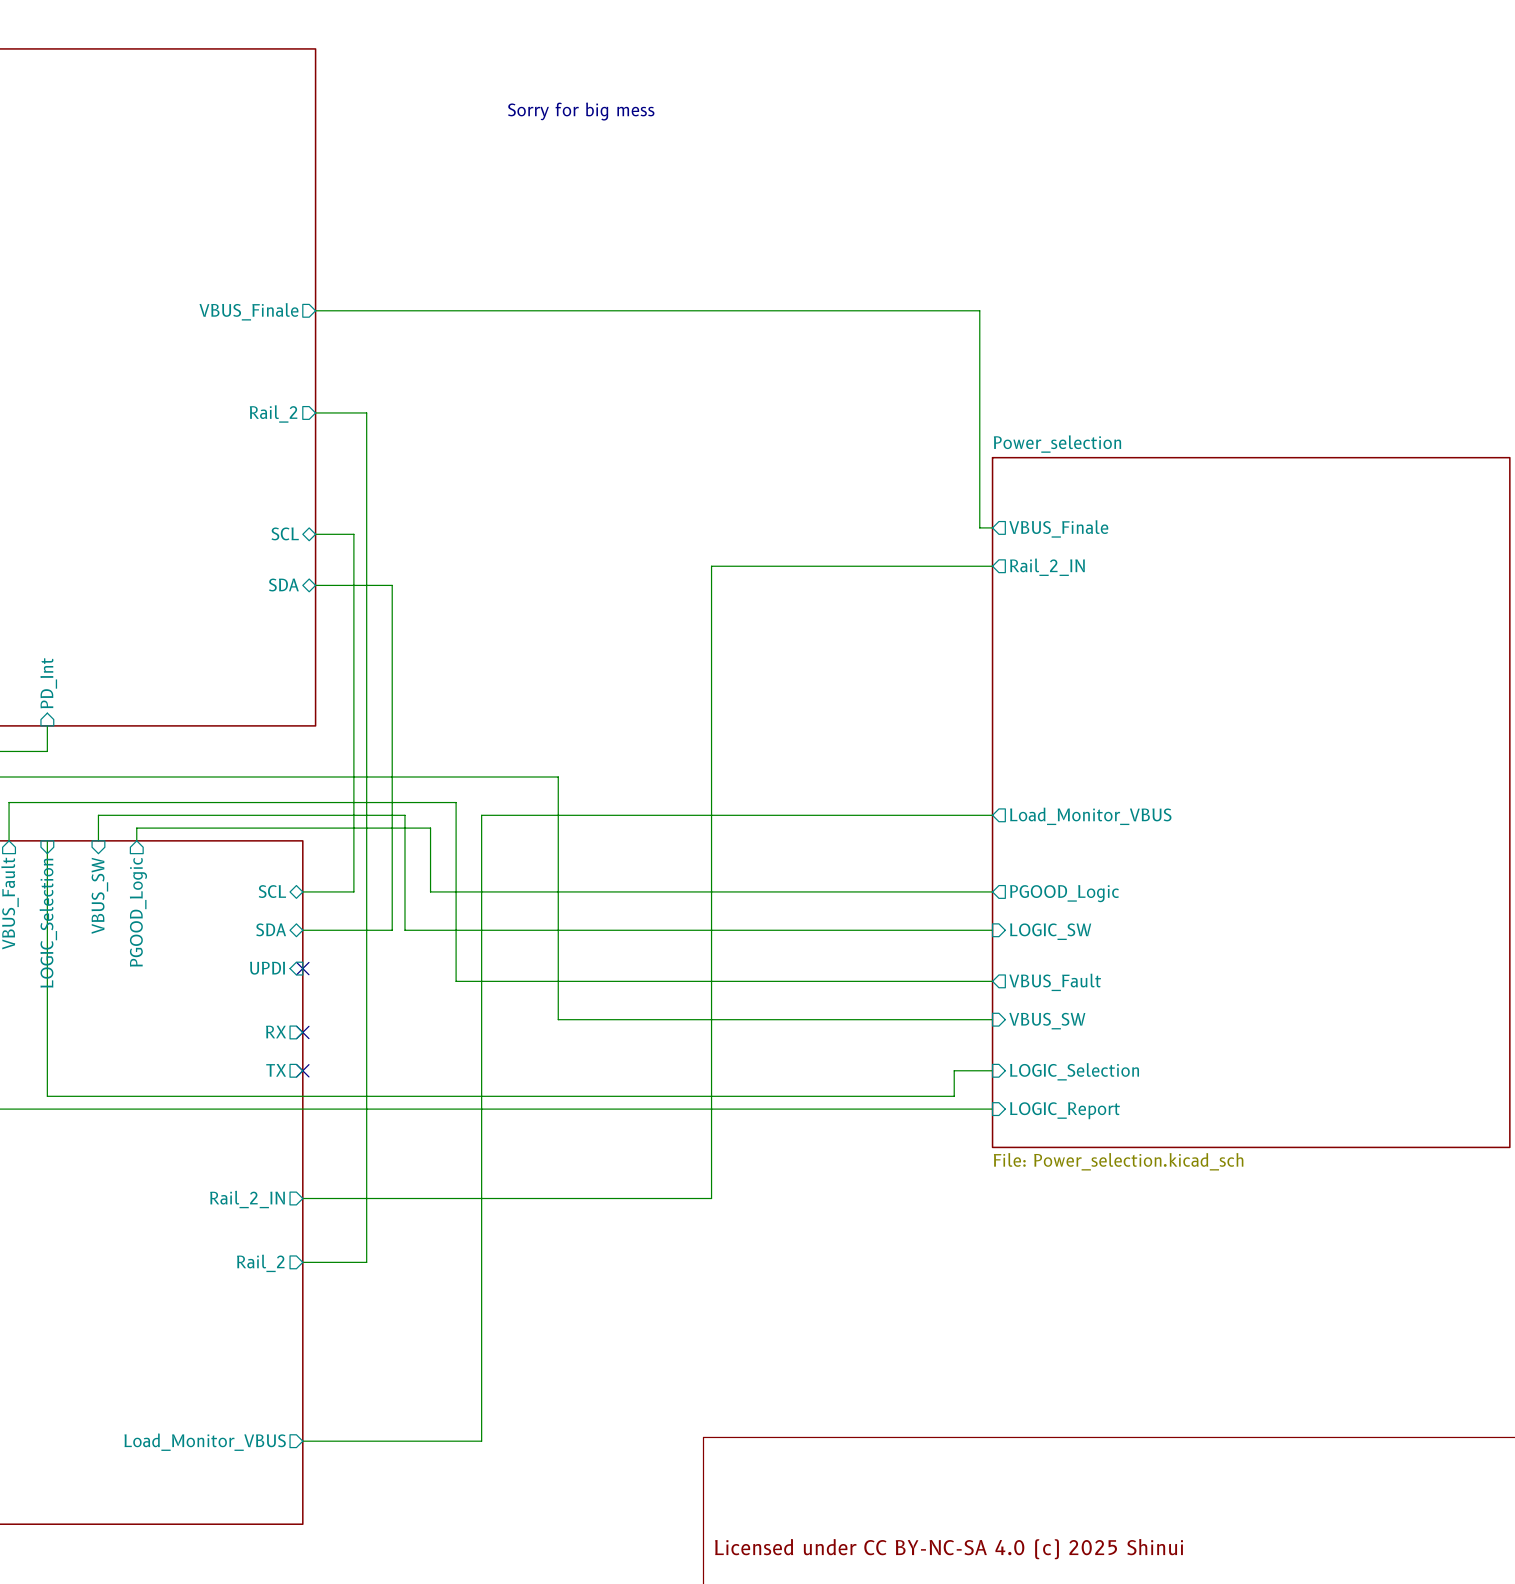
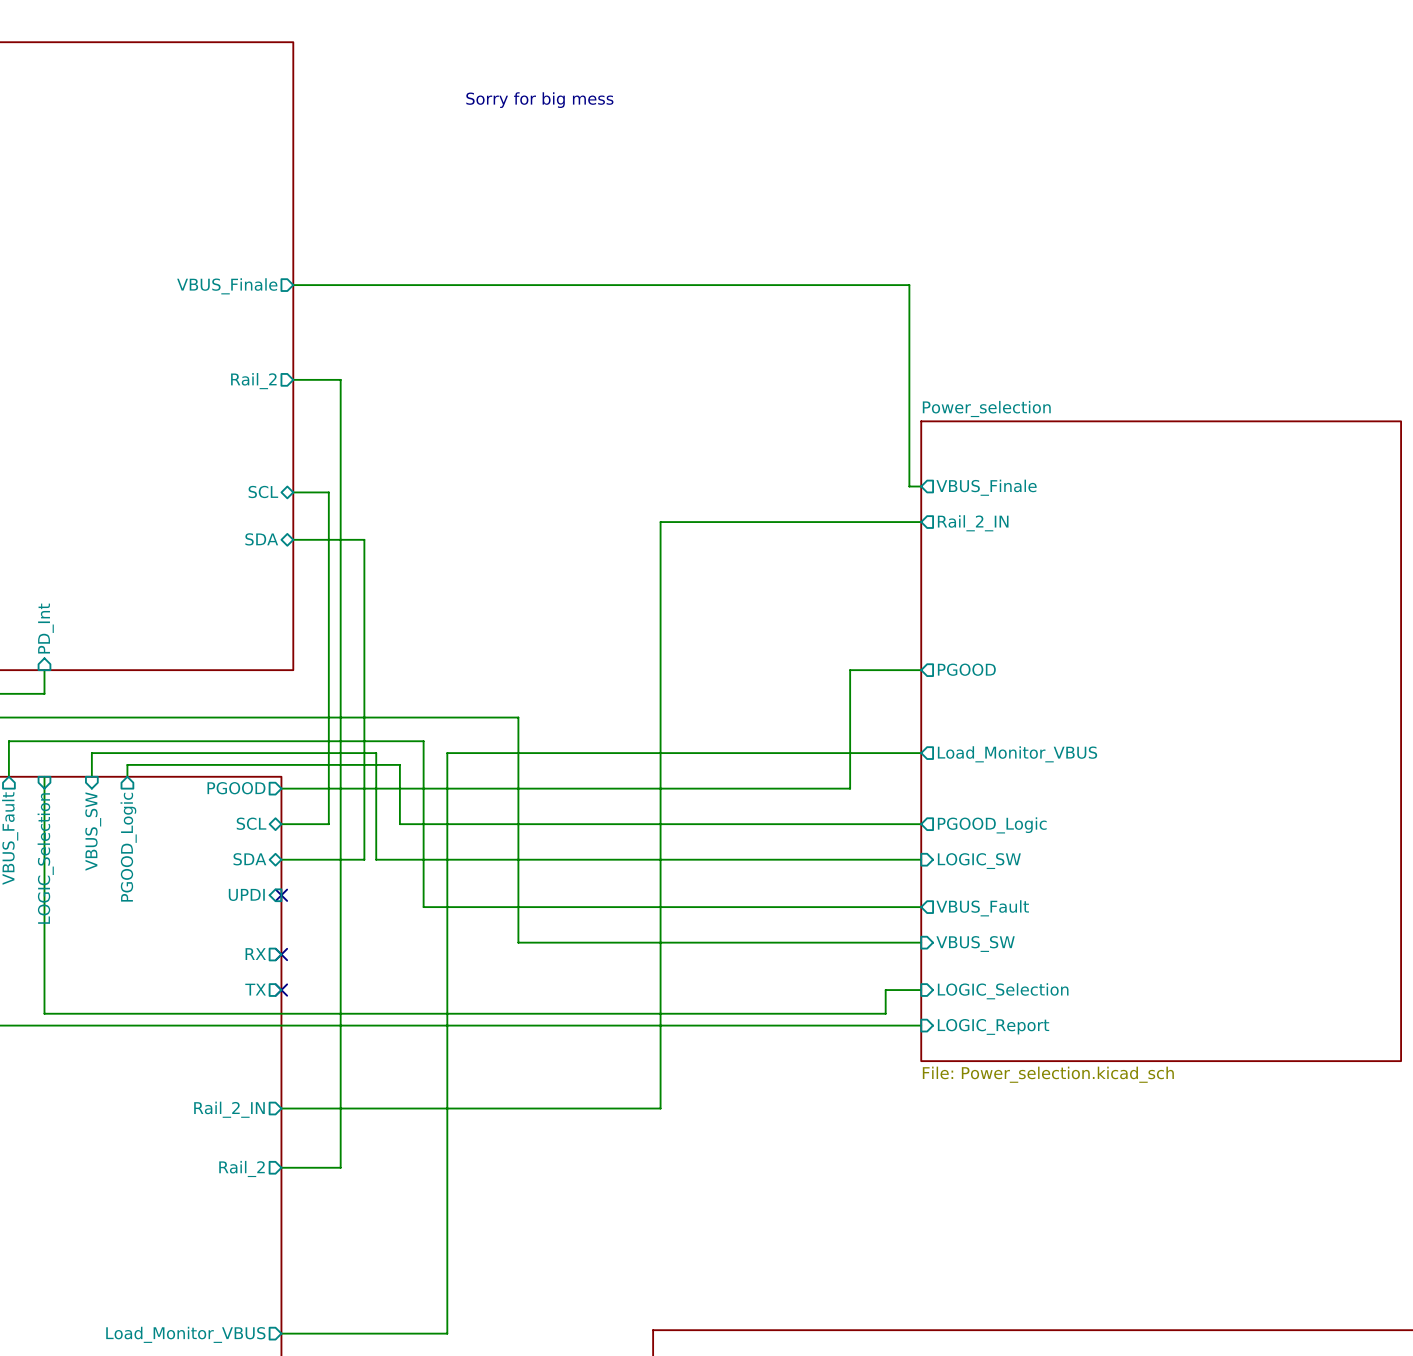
wire: none -> (921, 670) (850, 670) (850, 788) (281, 788)
sheet pin: none -> PGOOD (966, 669)
sheet pin: none -> PGOOD (236, 788)

